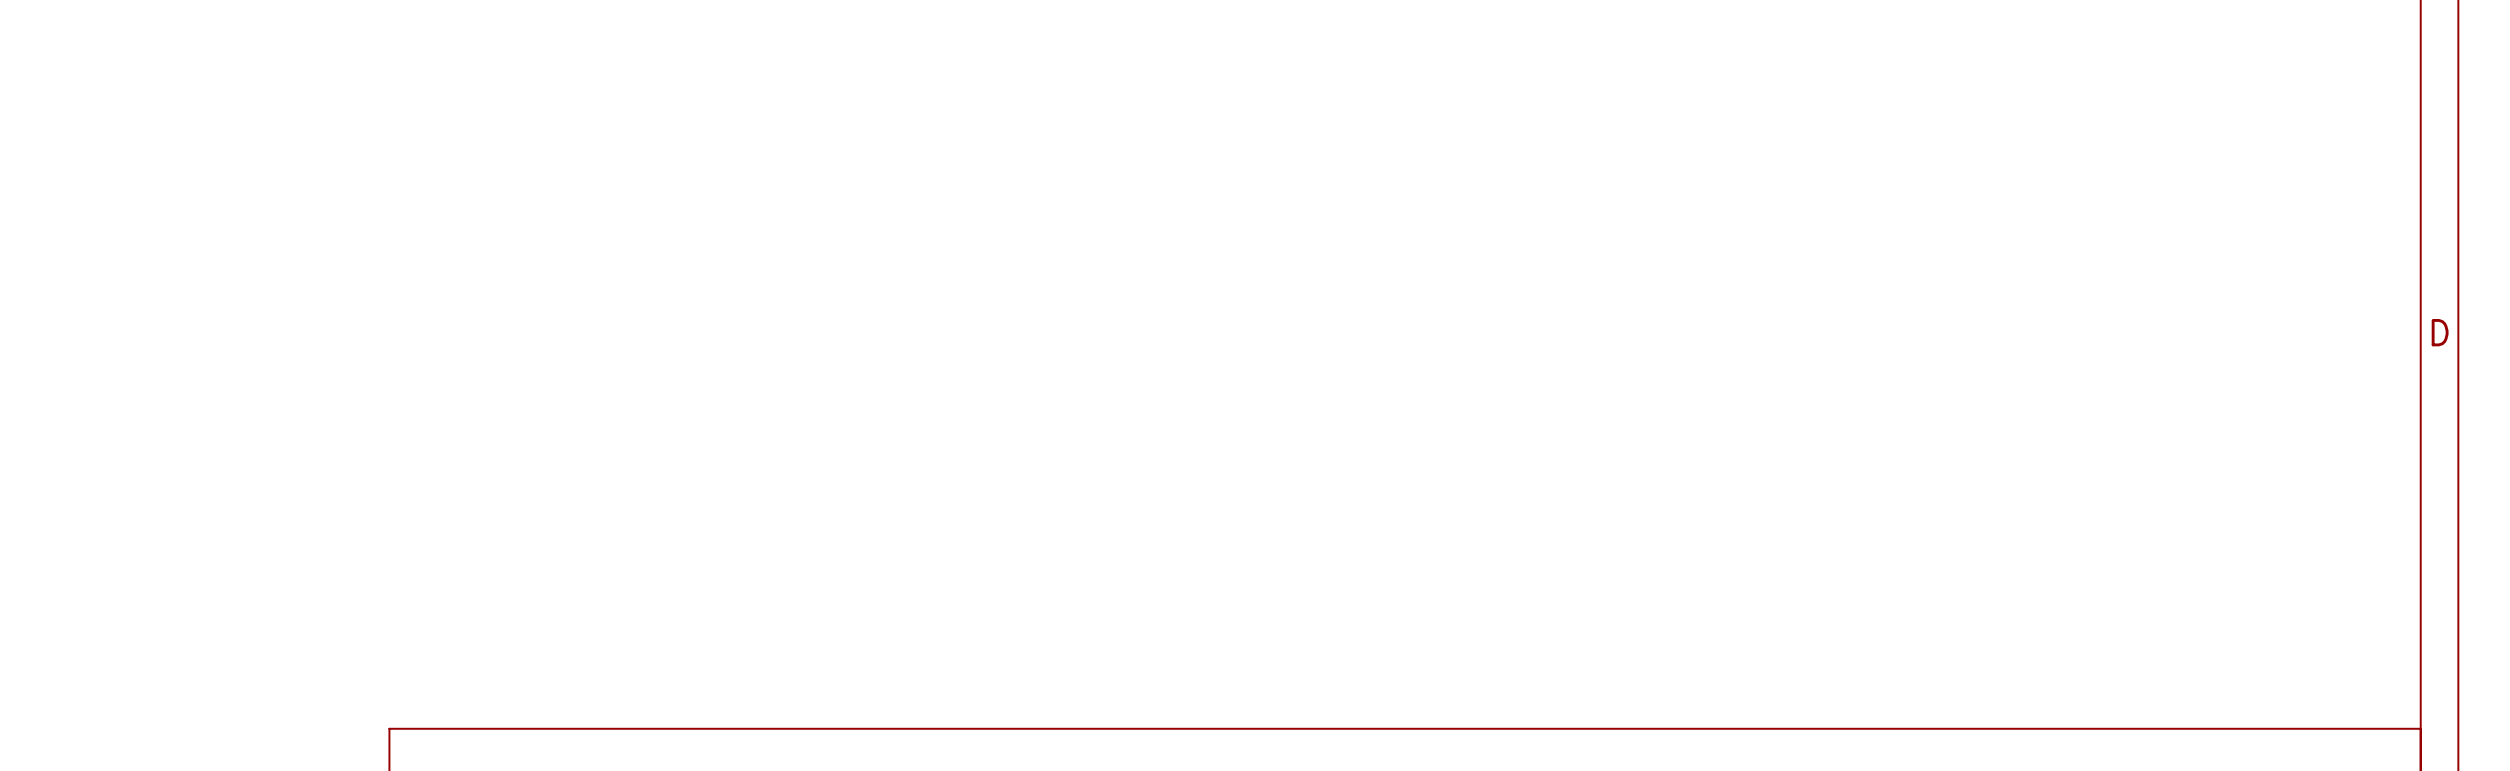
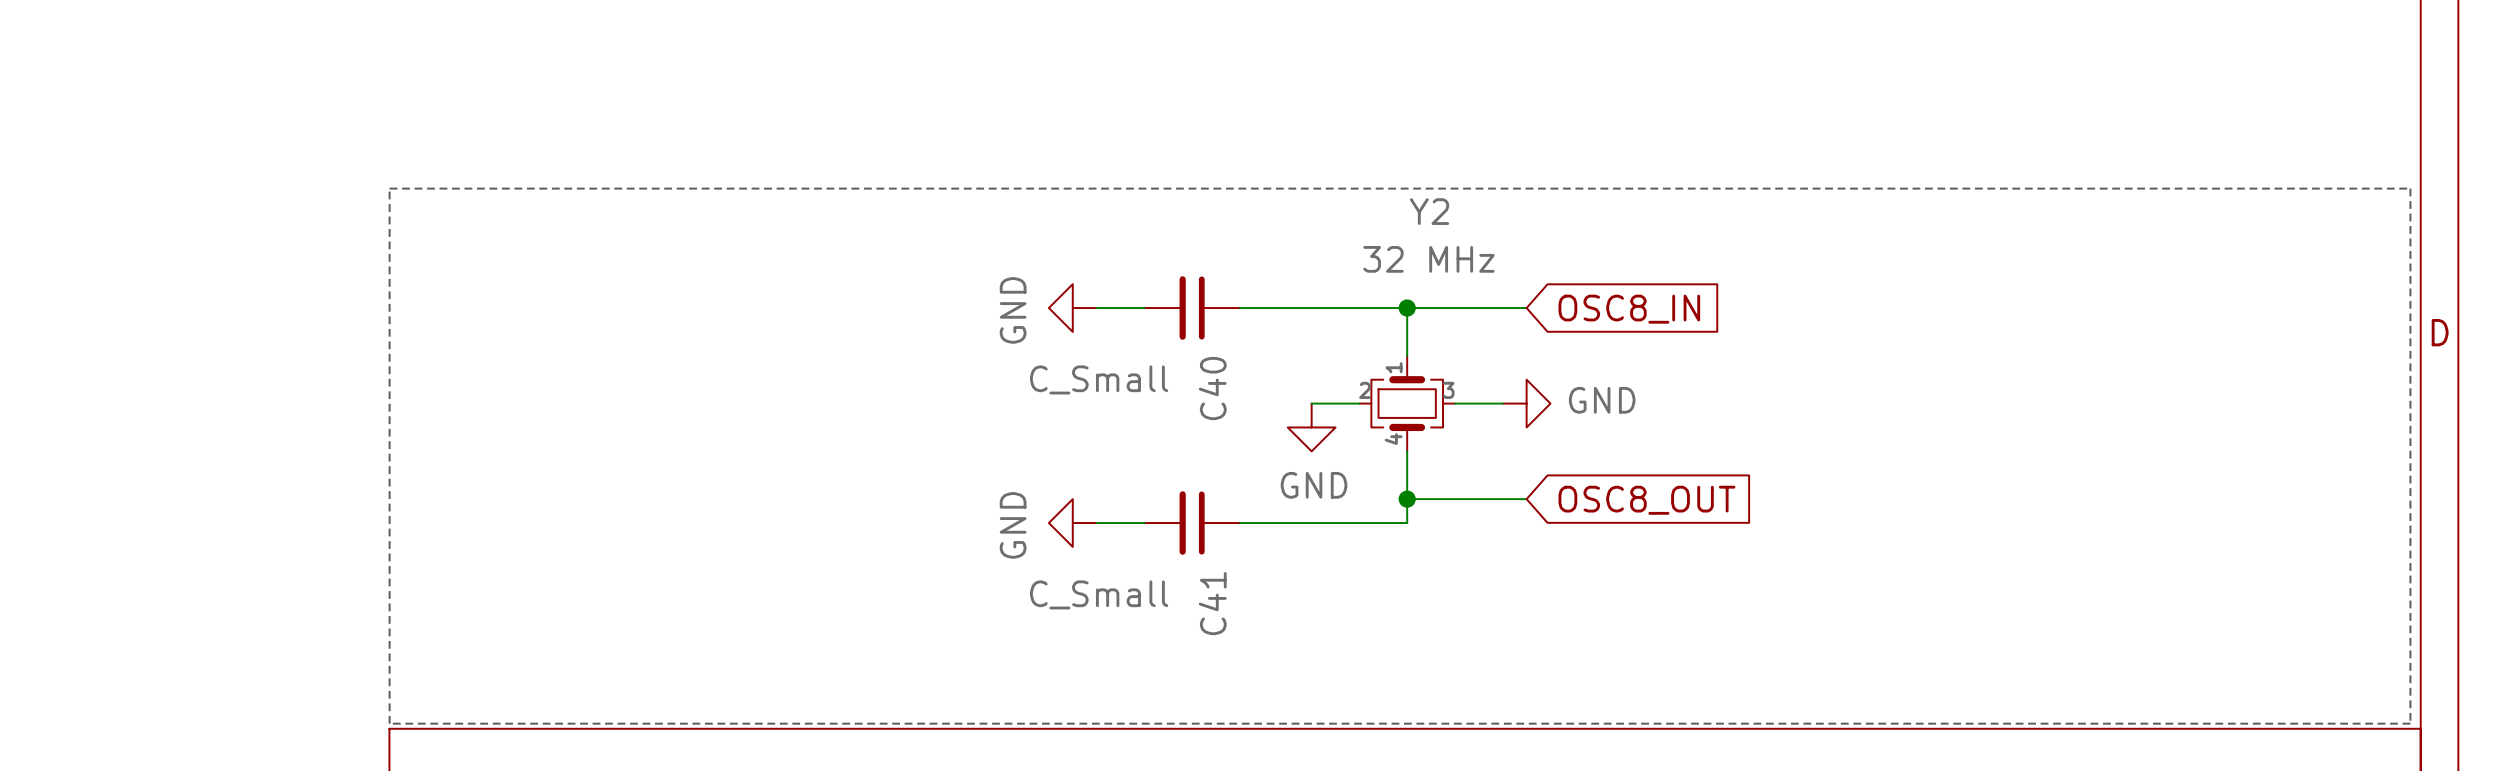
line: none -> (389, 188) (389, 723) (2410, 723) (2410, 188) (389, 188)
power symbol: none -> GND (1072, 308)
wire: none -> (1096, 308) (1144, 308)
C40: none -> C_Small (1192, 308)
wire: none -> (1239, 308) (1526, 308)
wire: none -> (1407, 308) (1407, 355)
junction: none -> (1407, 308)
global label: none -> OSC8_IN (1629, 309)
wire: none -> (1311, 403) (1359, 403)
Y2: none -> 32 MHz (1407, 403)
wire: none -> (1454, 403) (1502, 403)
power symbol: none -> GND (1526, 403)
power symbol: none -> GND (1311, 427)
wire: none -> (1407, 451) (1407, 523) (1239, 523)
wire: none -> (1407, 499) (1526, 499)
junction: none -> (1407, 499)
global label: none -> OSC8_OUT (1646, 500)
power symbol: none -> GND (1072, 523)
wire: none -> (1096, 523) (1144, 523)
C41: none -> C_Small (1192, 523)

